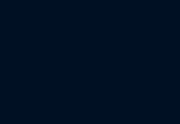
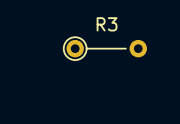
R3: none -> (104, 48)

